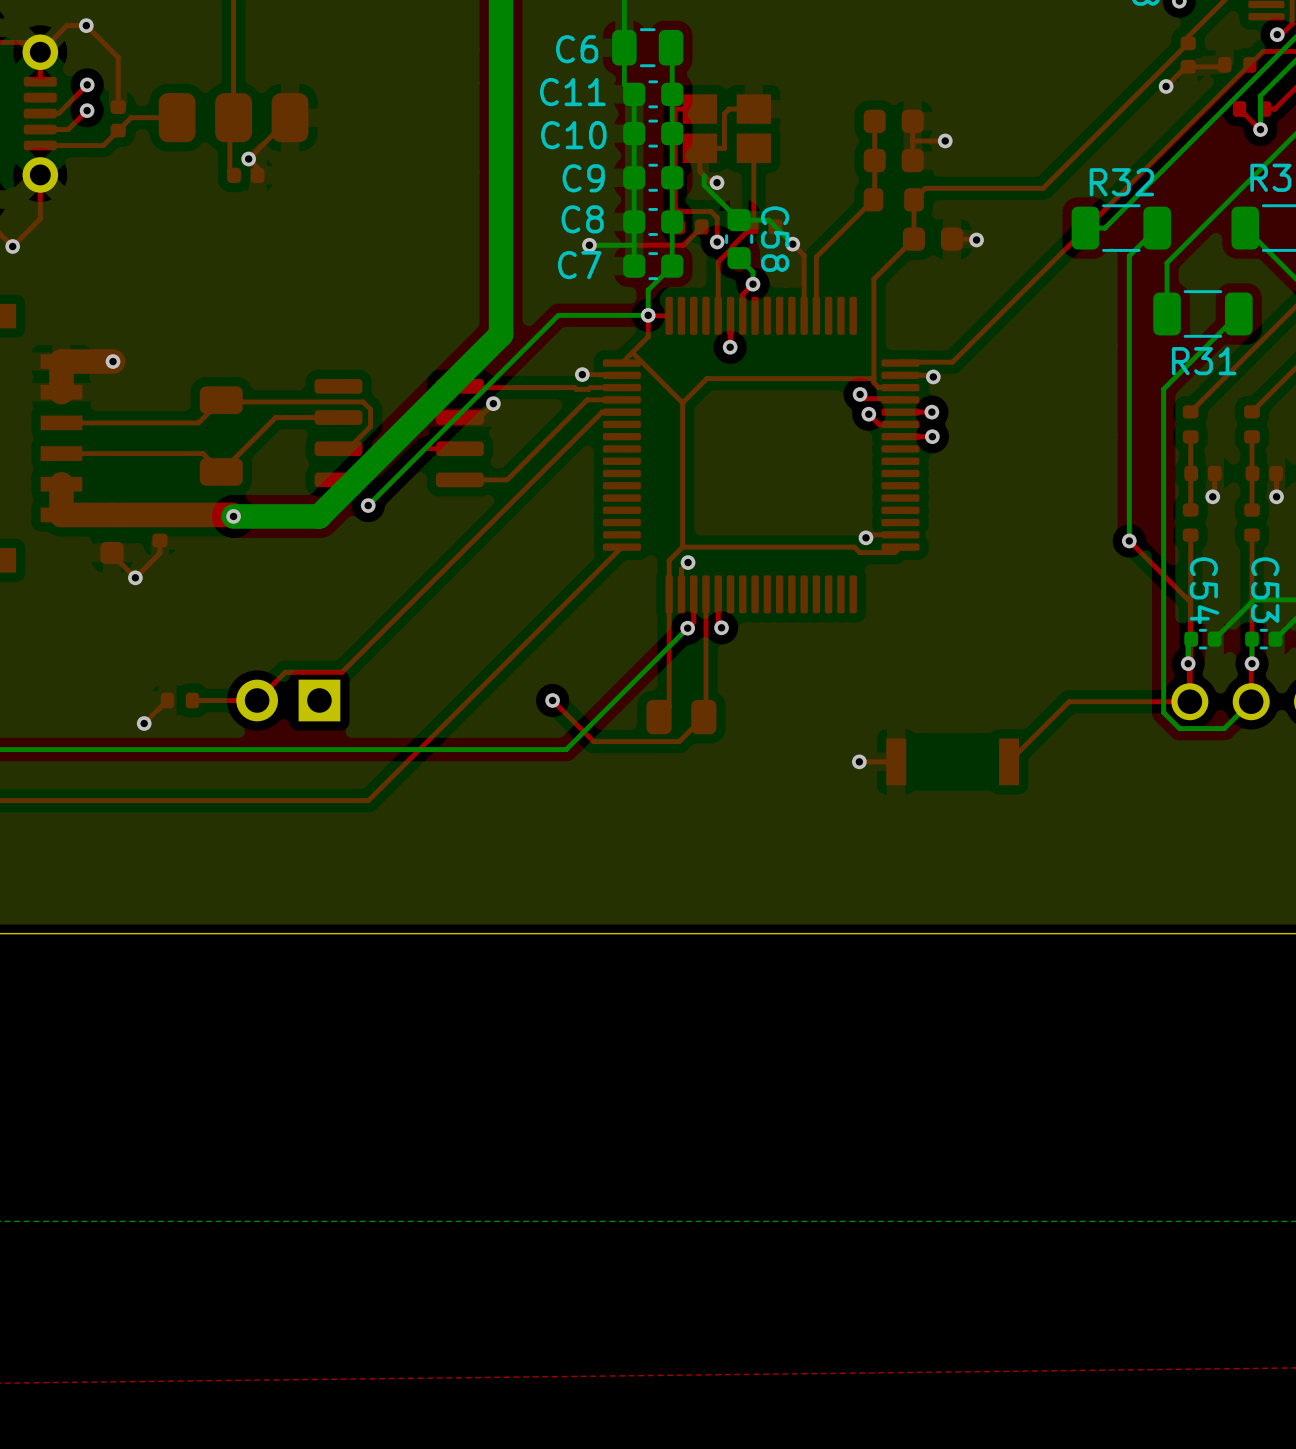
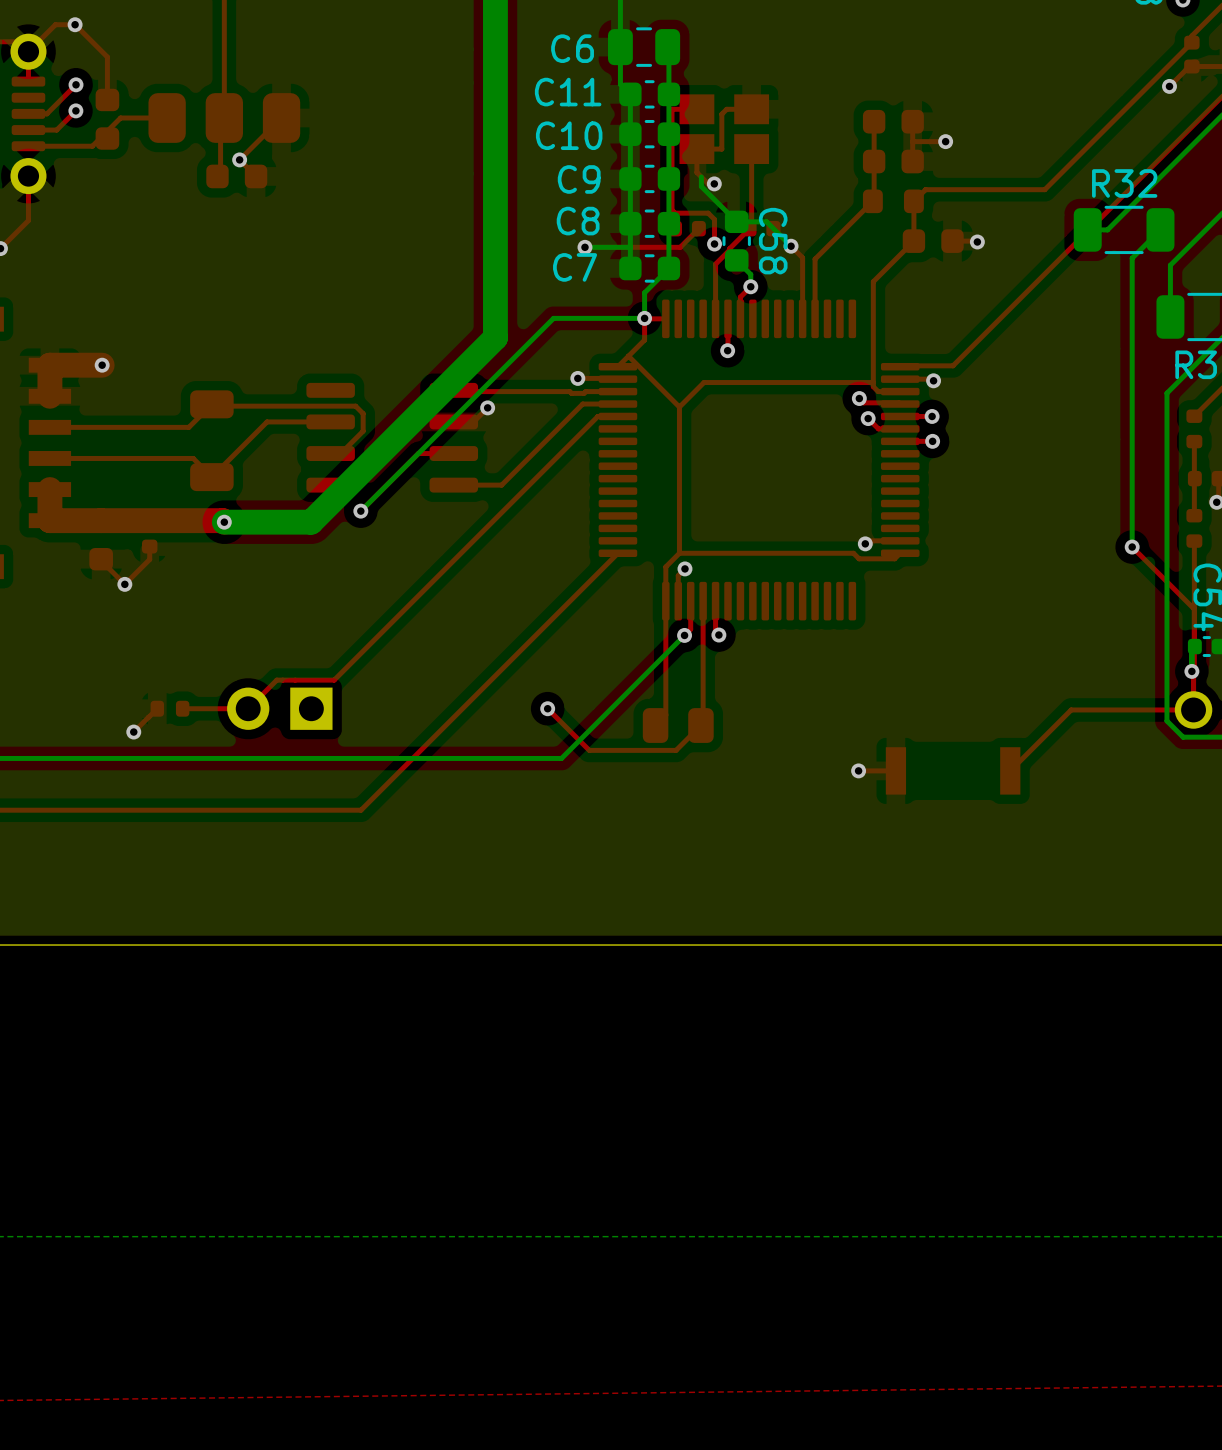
part footprint: [110, 100, 126, 138] -> [95, 88, 120, 150]
part footprint: [227, 167, 265, 183] -> [206, 164, 268, 189]

